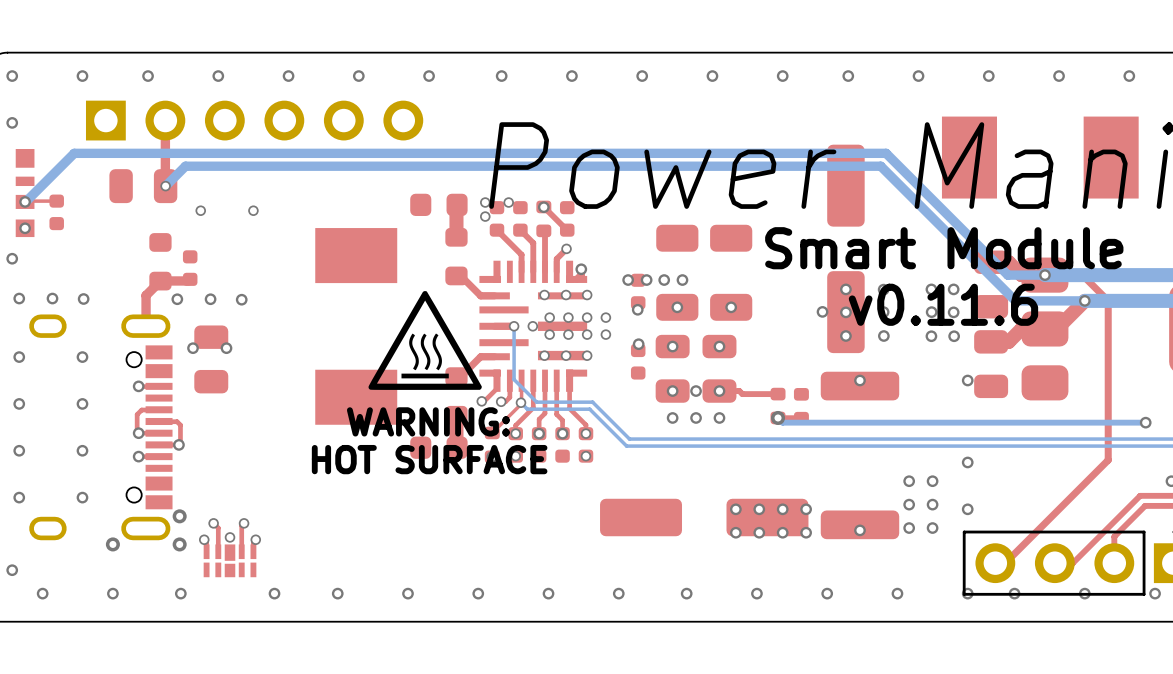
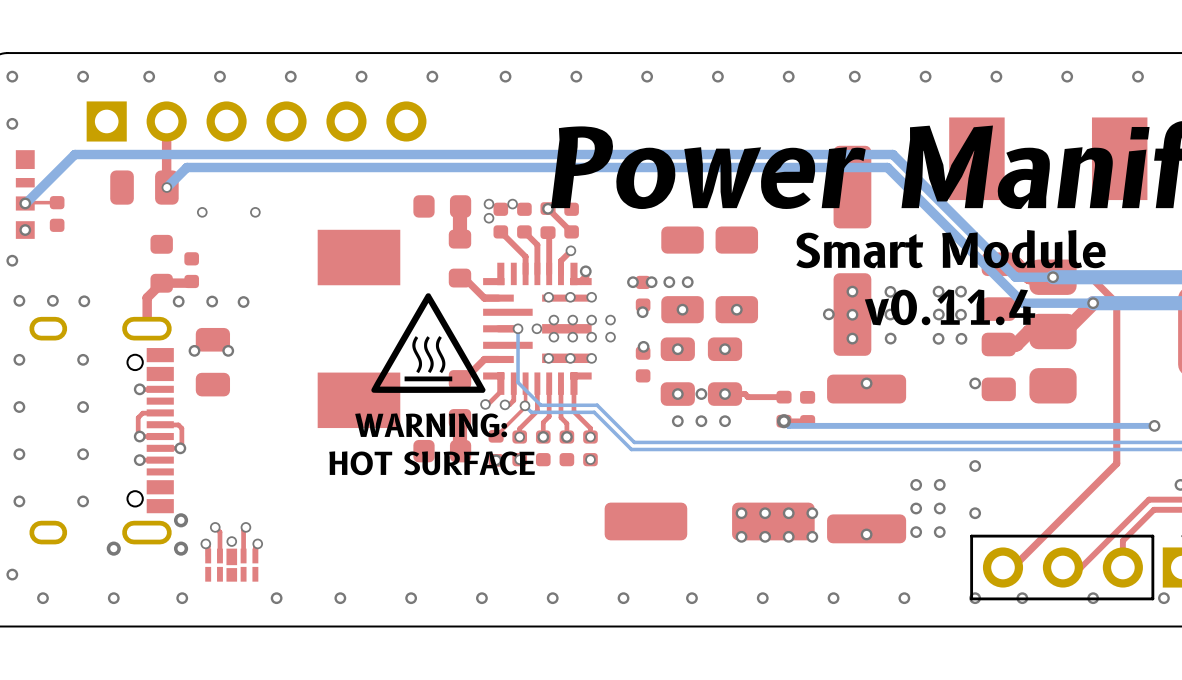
text: v0.11.6 (943, 304) -> v0.11.4 (950, 307)

